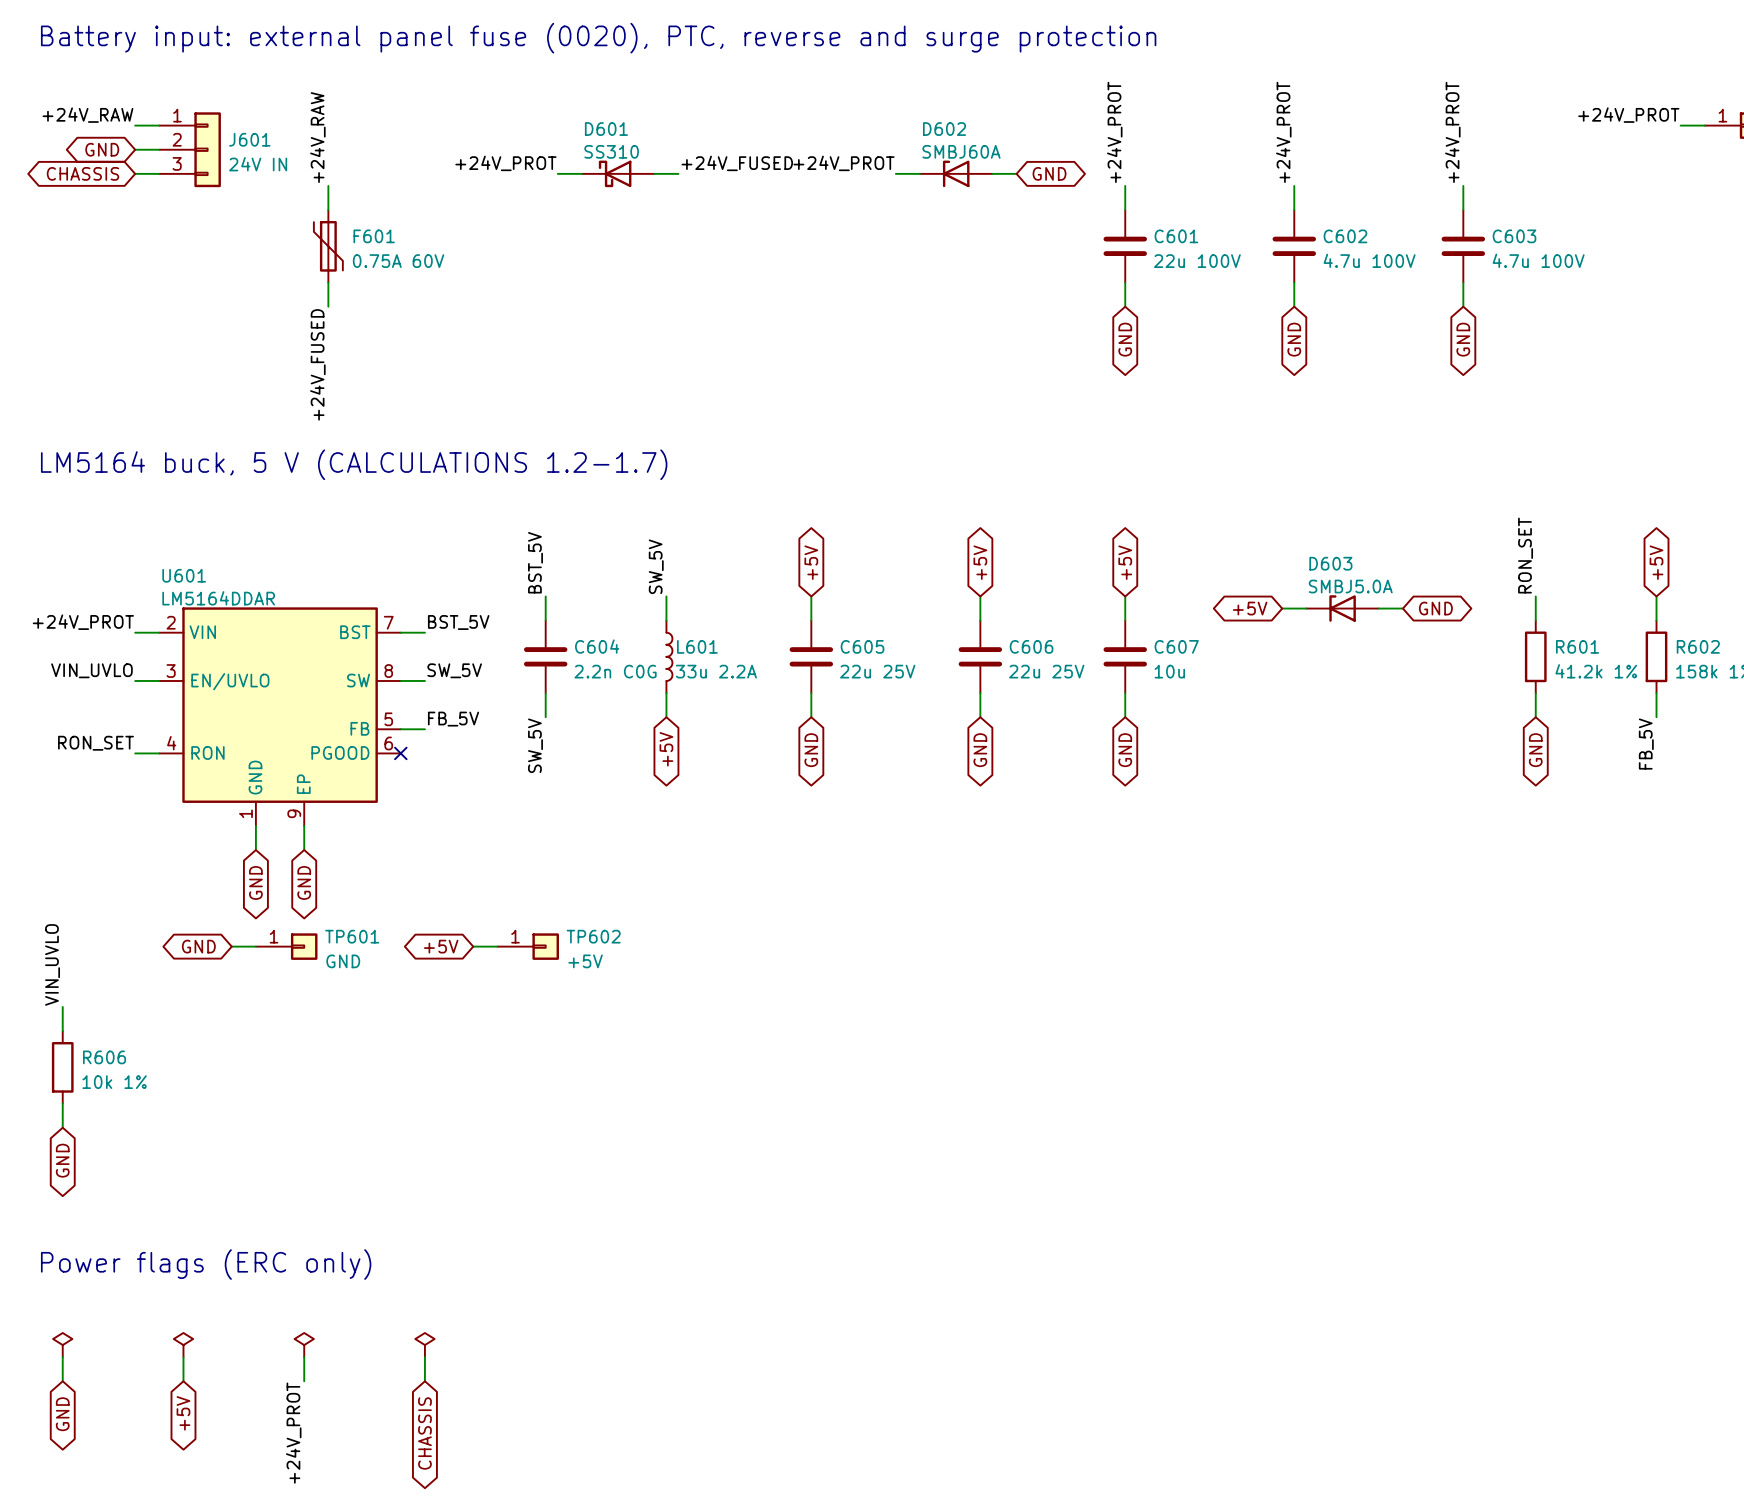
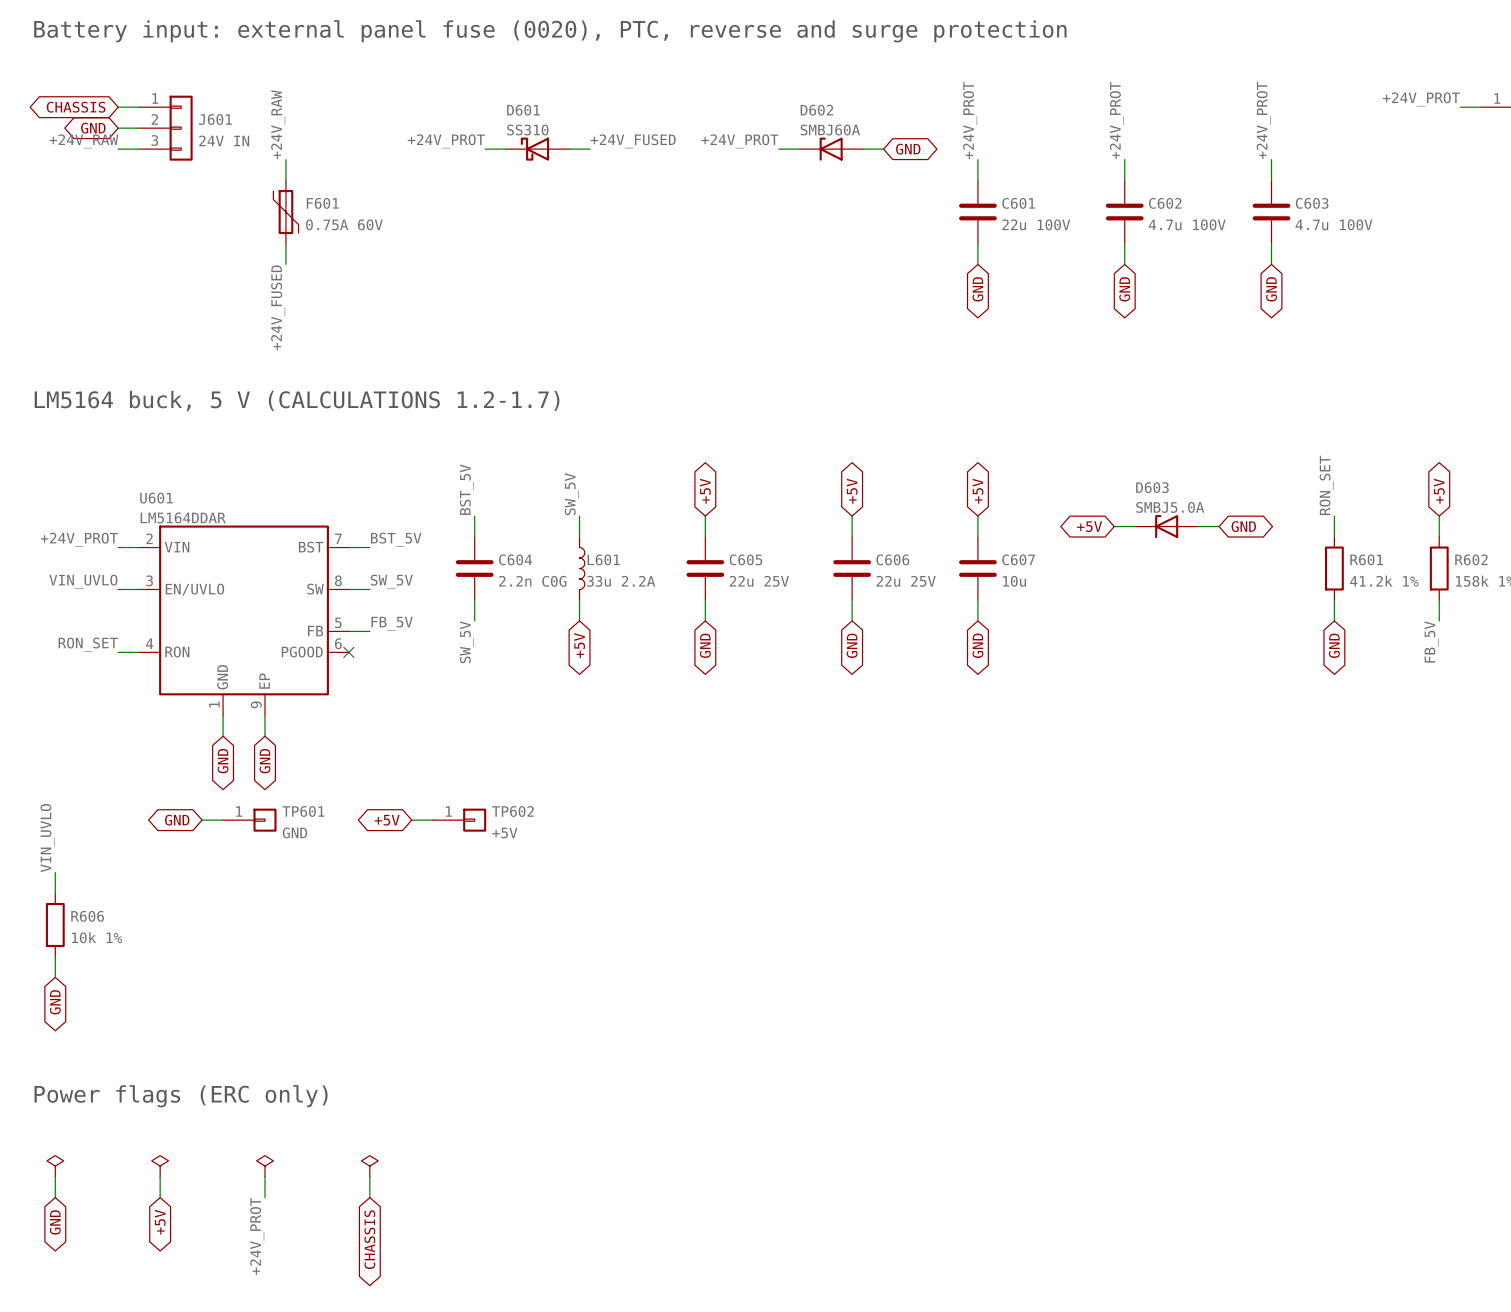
label position: +24V_RAW (87, 115) -> +24V_RAW (83, 141)
global label position: CHASSIS (82, 173) -> CHASSIS (76, 107)

